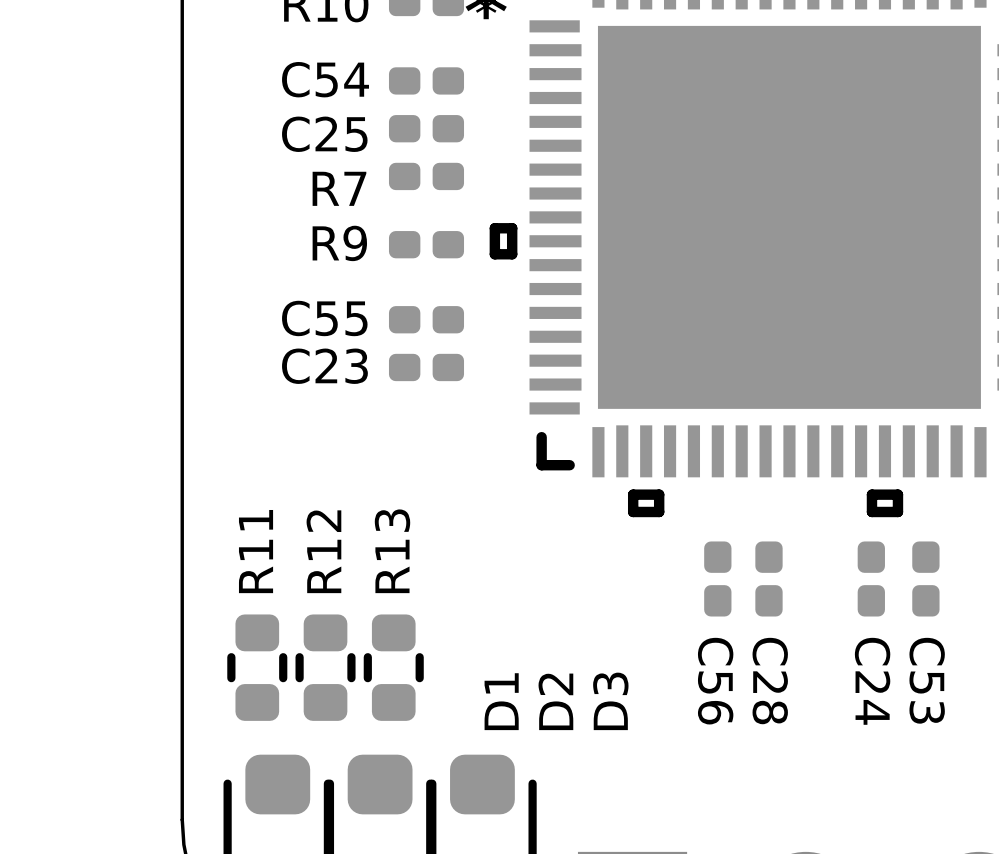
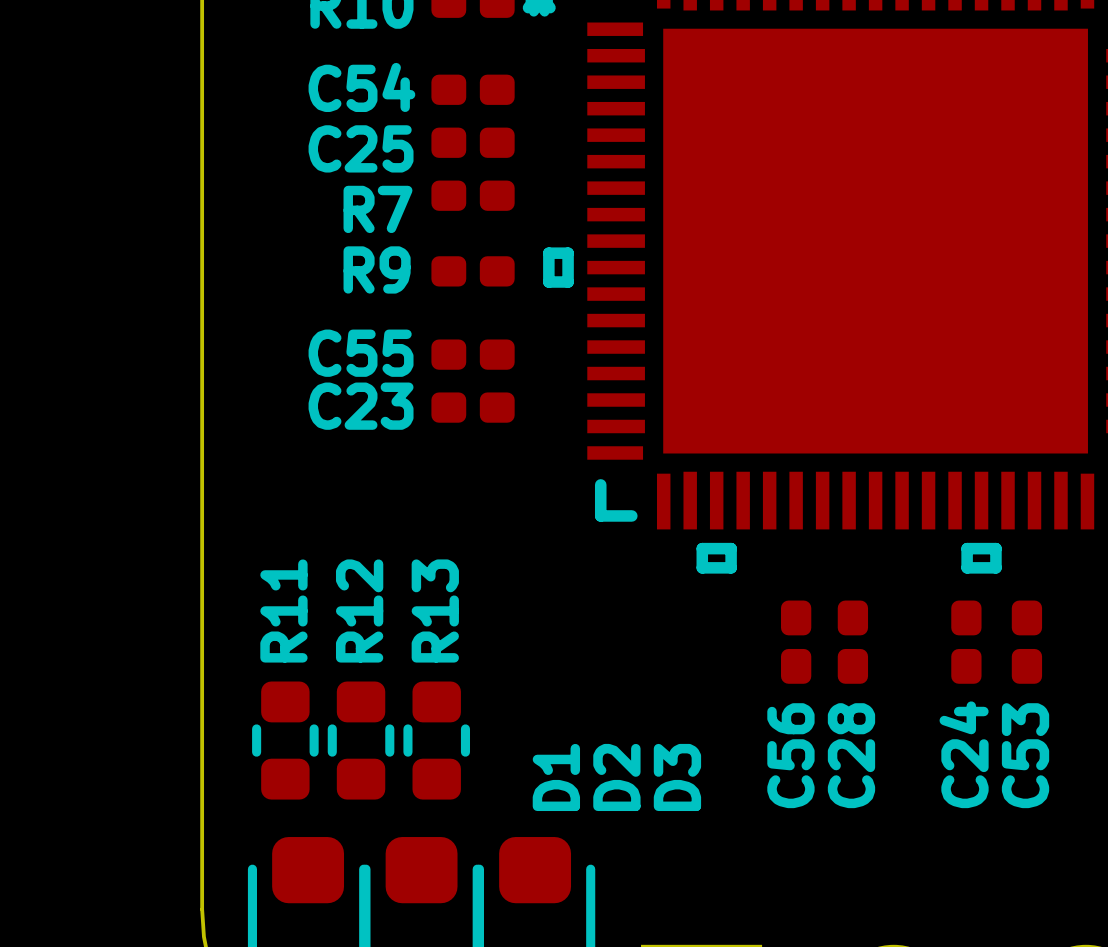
C53 name rotation: 0° (927, 680) -> 180° (1025, 755)
C56 name rotation: 0° (715, 681) -> 180° (790, 755)
C28 name rotation: 0° (770, 681) -> 180° (851, 755)
C24 name rotation: 0° (872, 681) -> 180° (964, 754)

